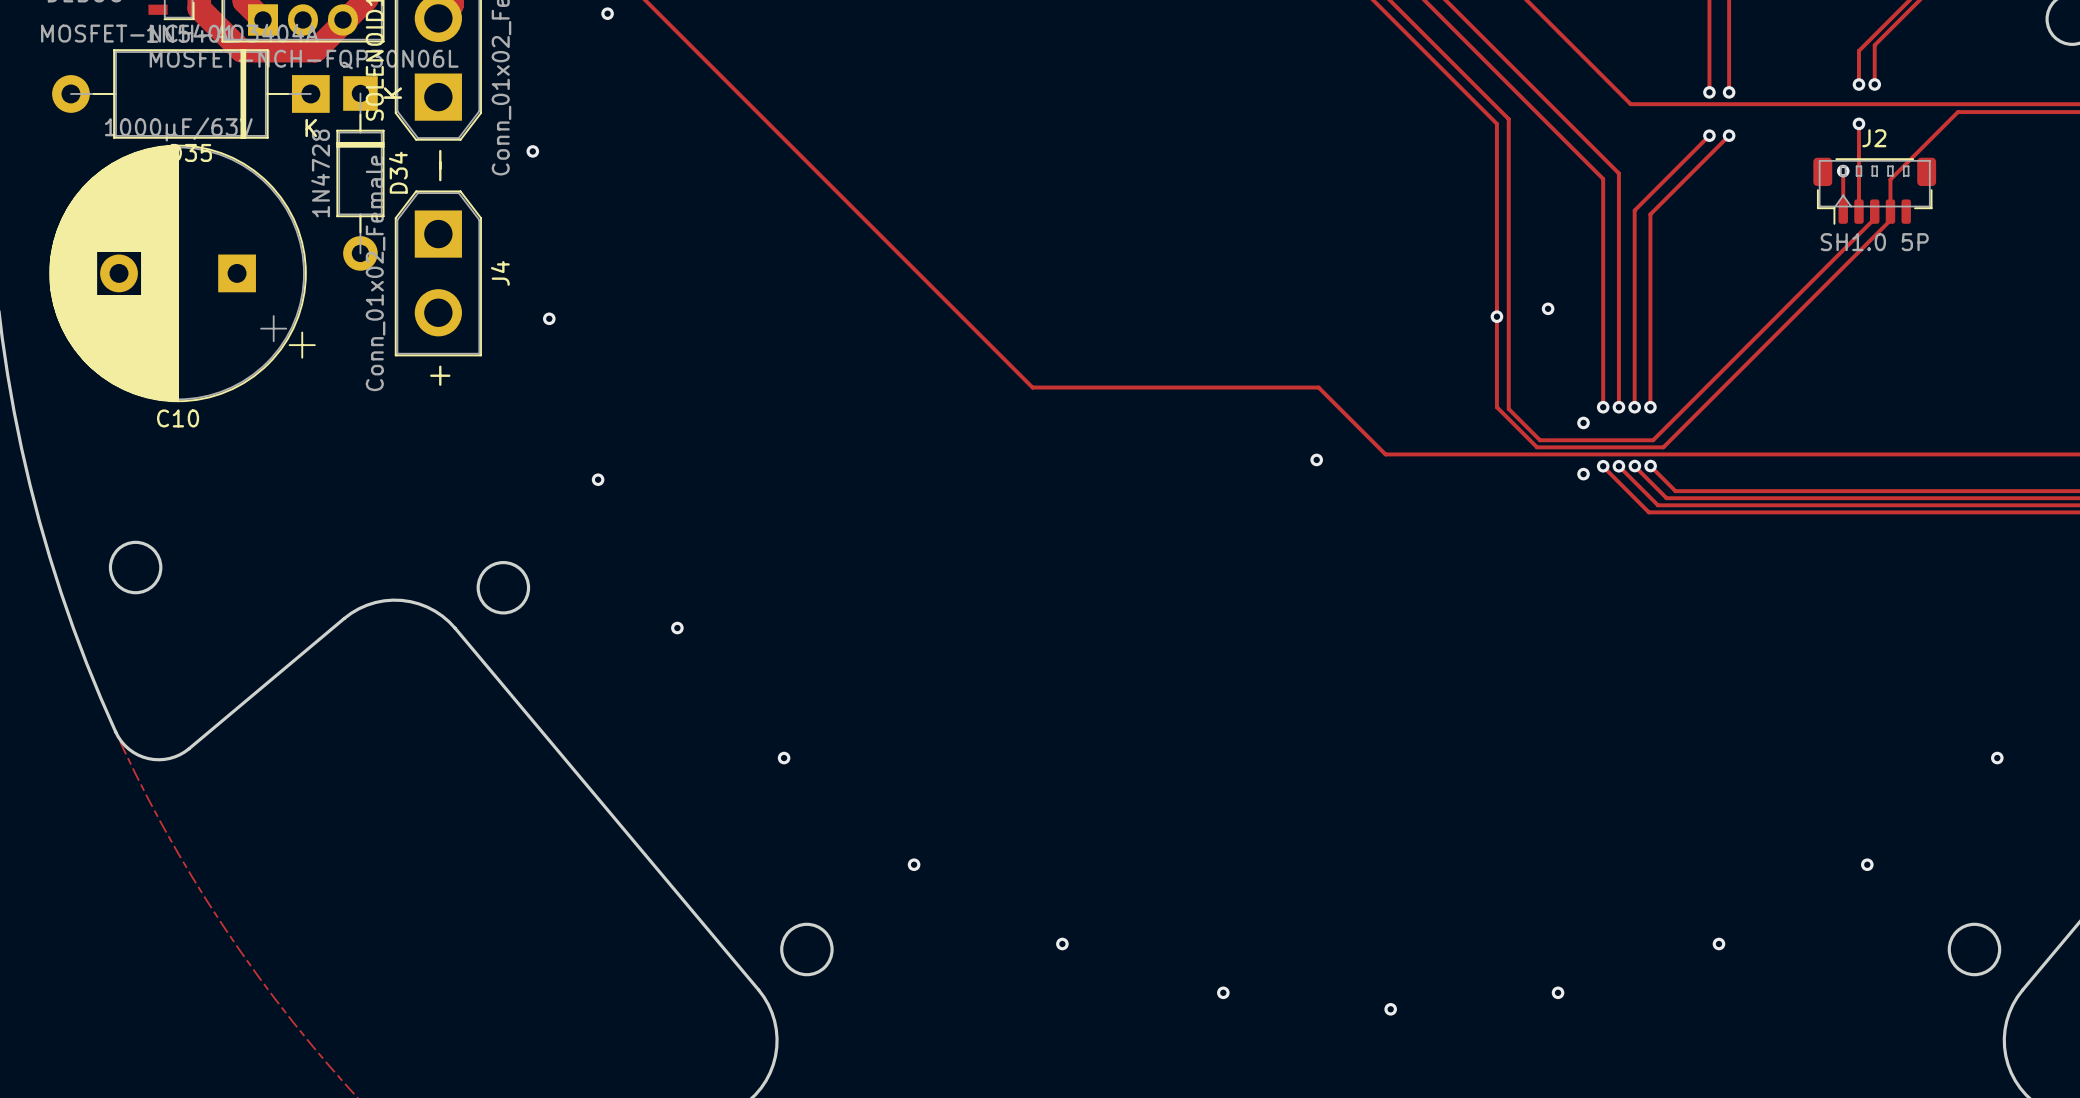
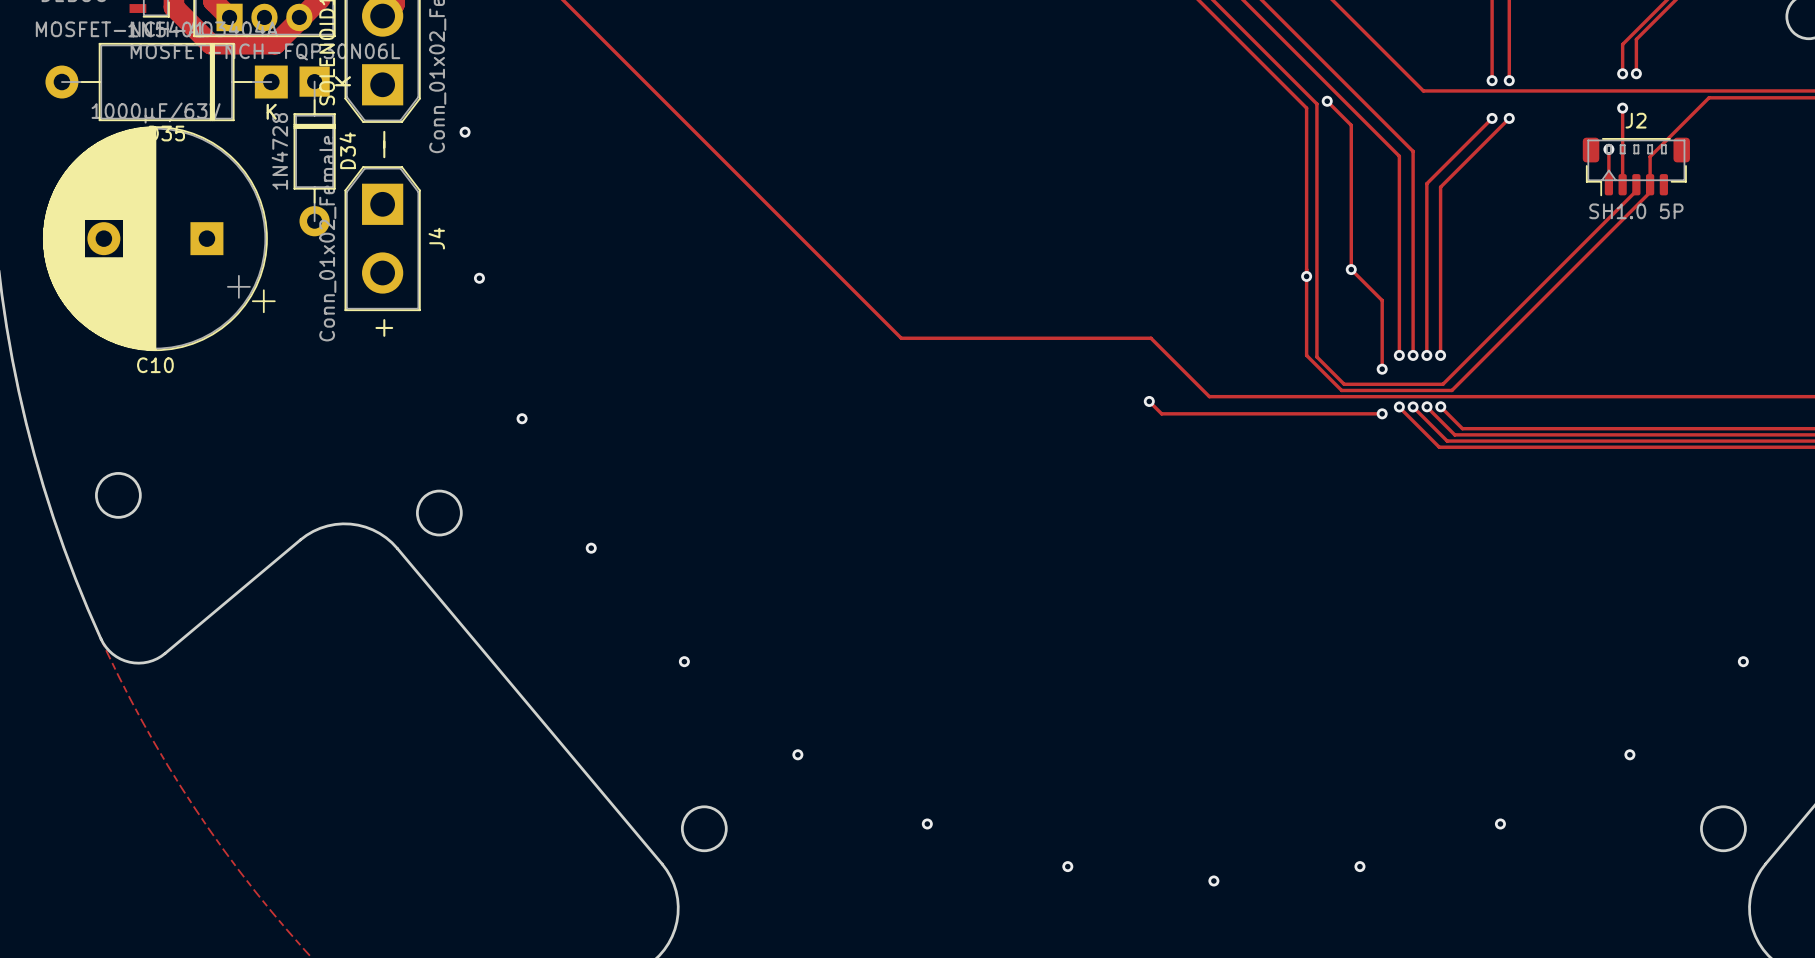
via: (607, 13) -> none
track: none -> (1327, 101) (1351, 125) (1351, 269) (1382, 300) (1382, 369)
via: none -> (1327, 101)
track: none -> (1149, 401) (1161, 413) (1382, 413)

